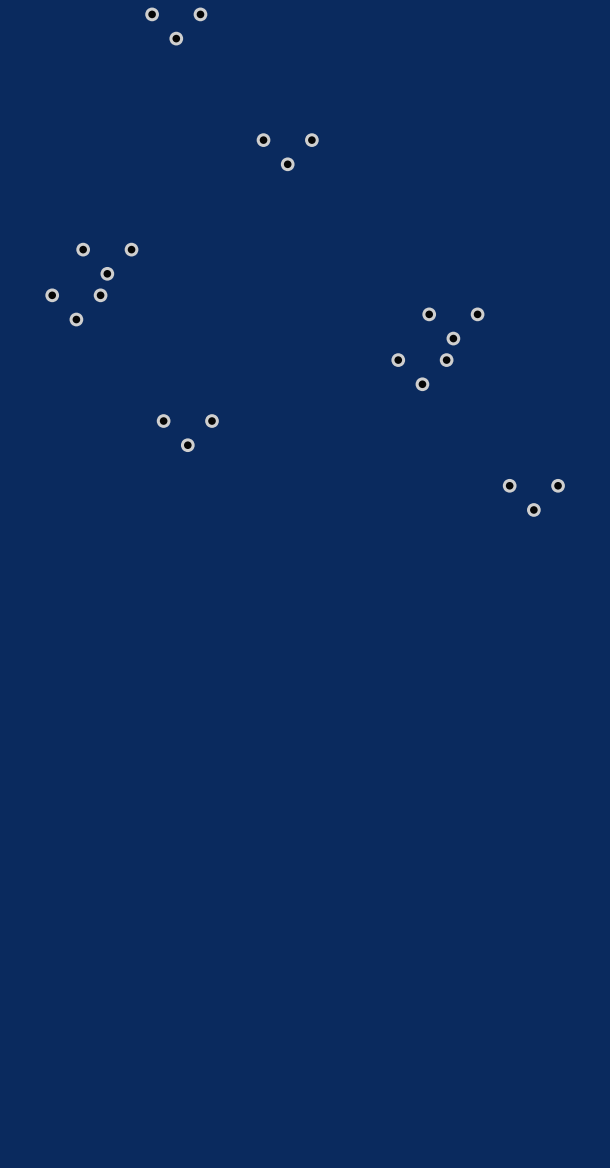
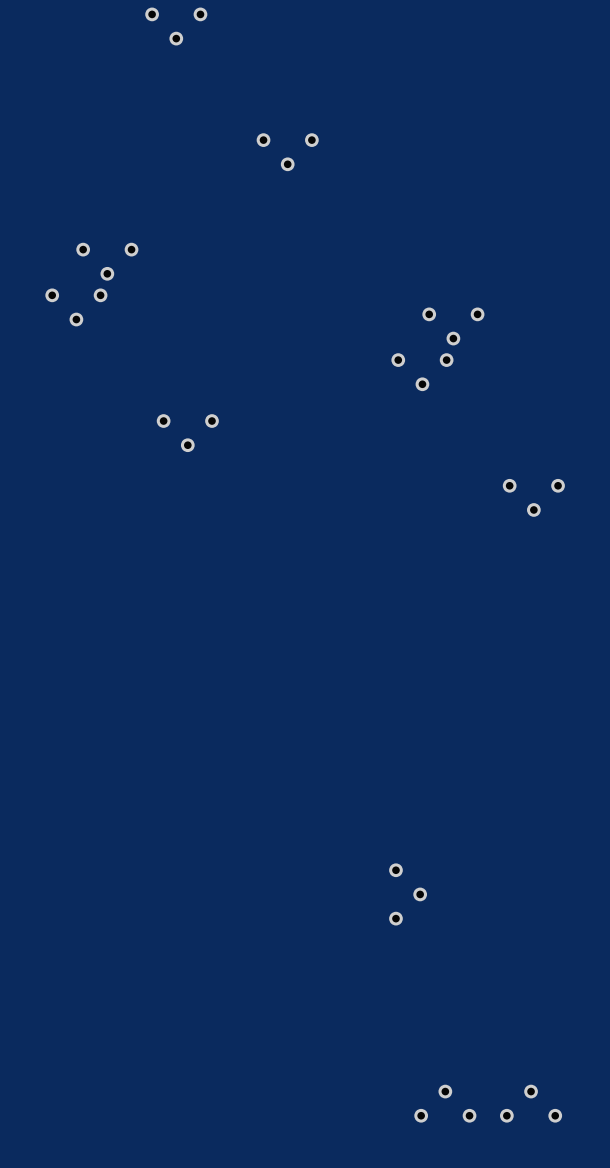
part: none -> (408, 894)
part: none -> (445, 1103)
part: none -> (531, 1103)

